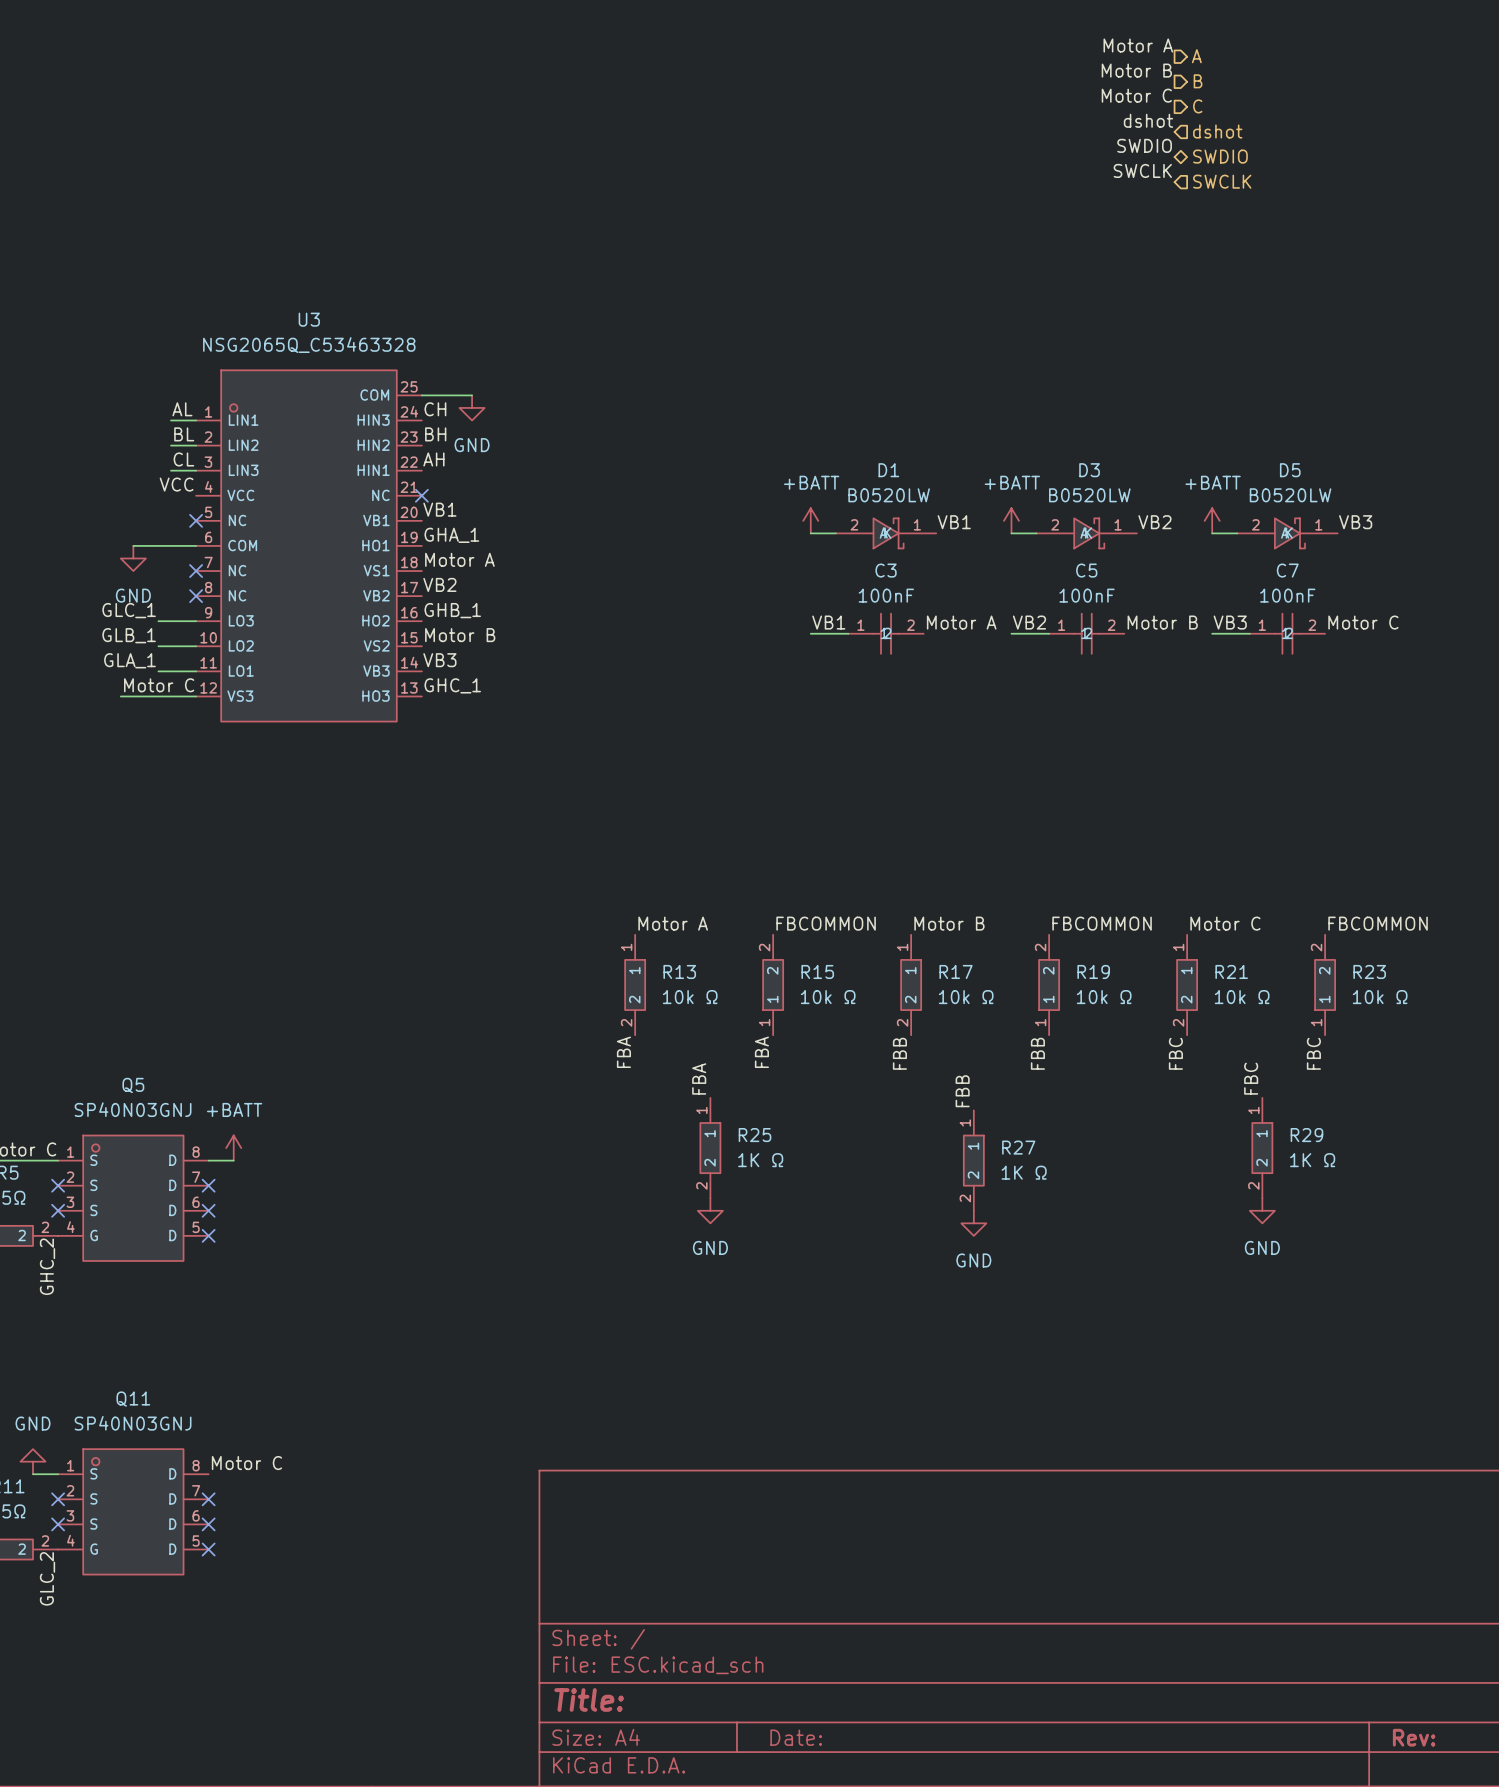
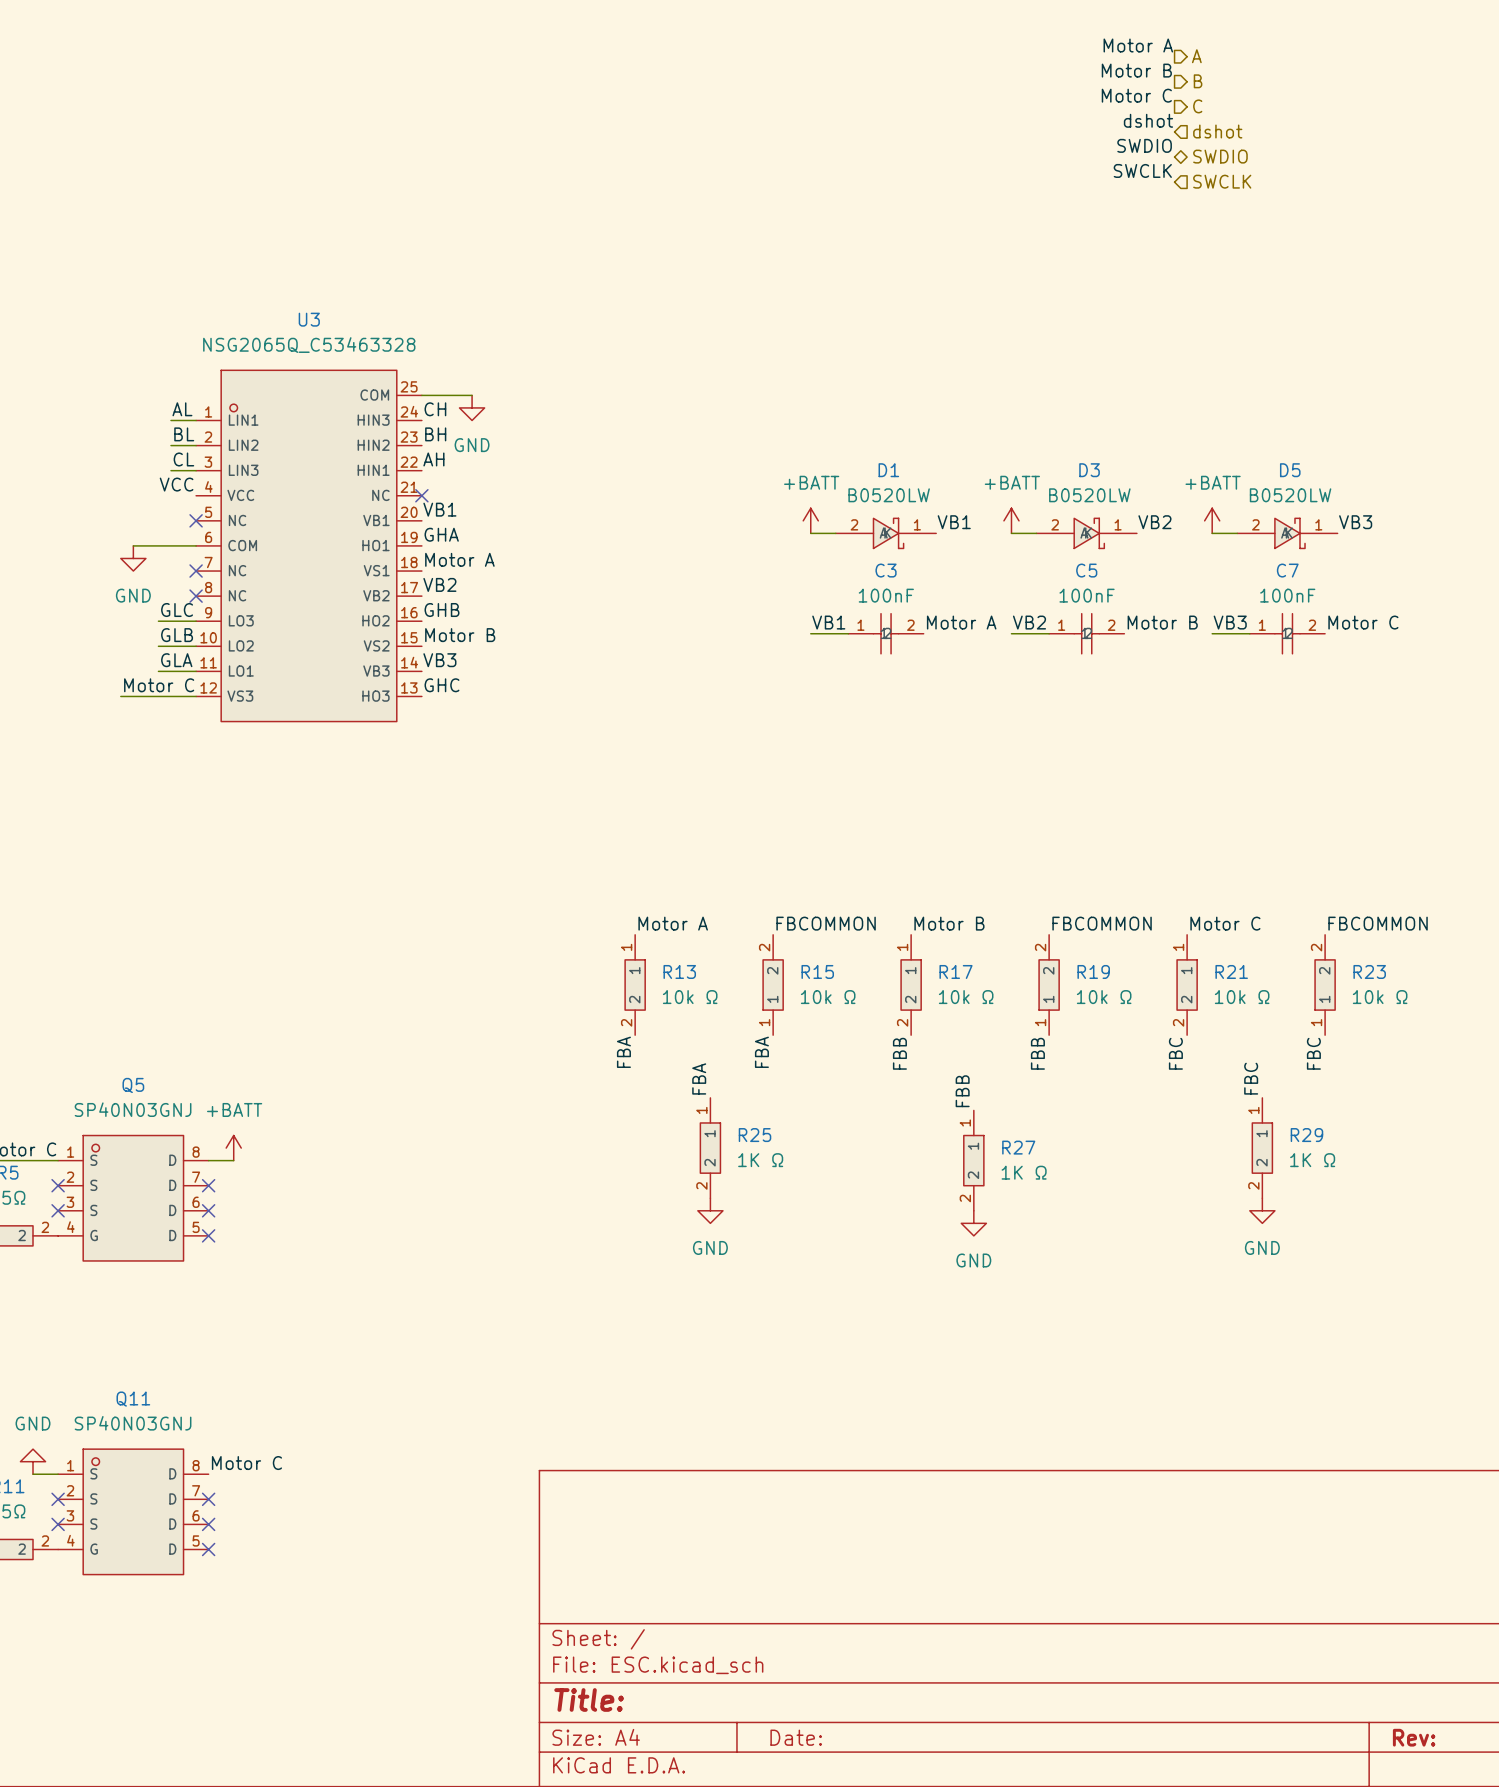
label: GHA_1 (451, 535) -> GHA (441, 534)
label: GLC_1 (129, 610) -> GLC (177, 610)
label: GHB_1 (452, 610) -> GHB (441, 610)
label: GLB_1 (129, 635) -> GLB (177, 635)
label: GLA_1 (129, 660) -> GLA (176, 660)
label: GHC_1 (452, 685) -> GHC (441, 685)
label: GHC_2 (47, 1266) -> none
label: GLC_2 (47, 1578) -> none

